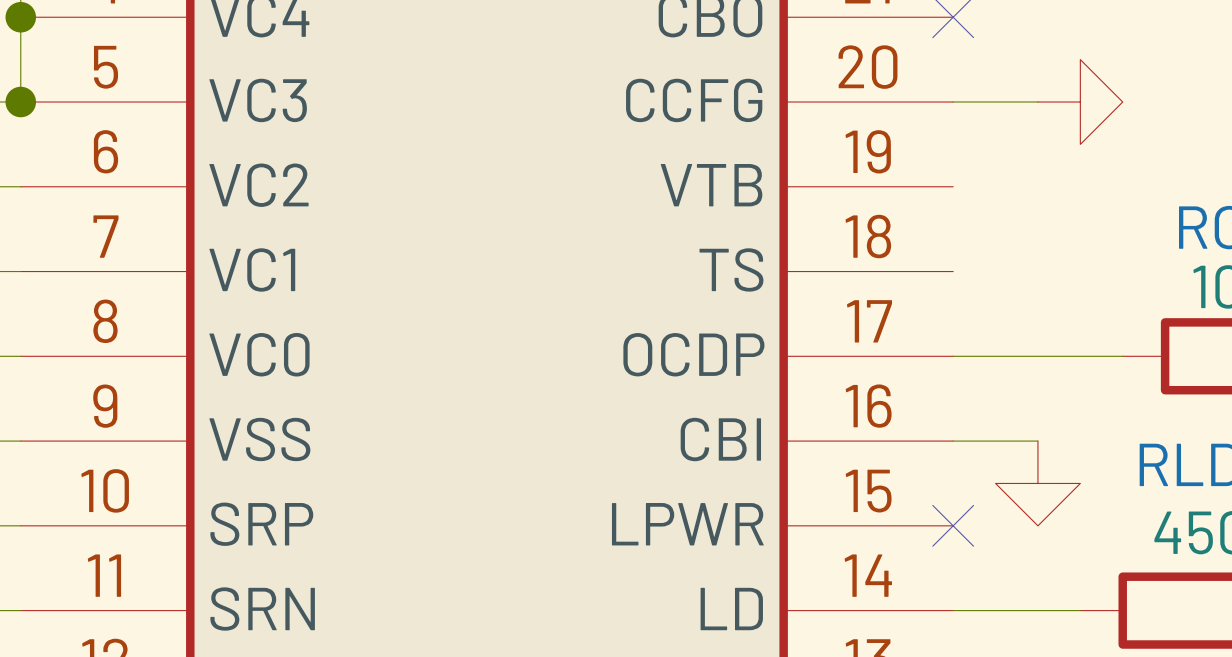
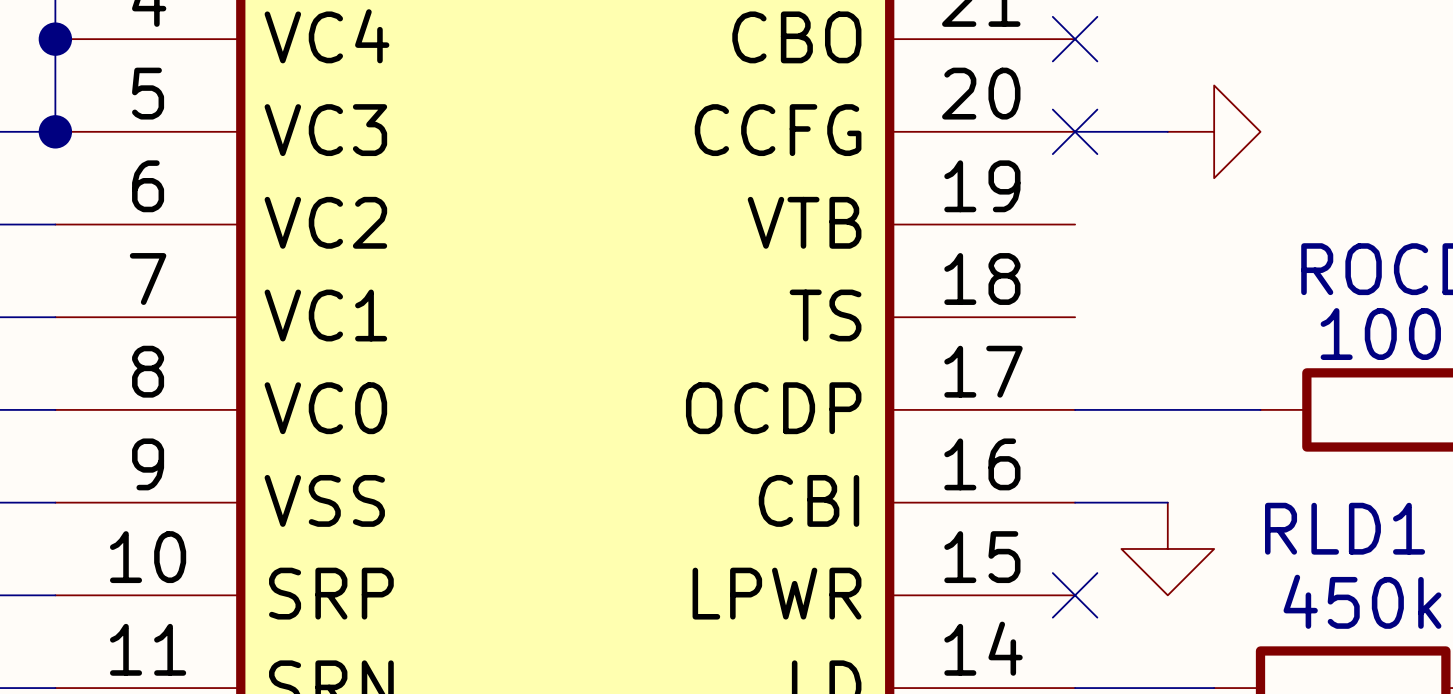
no-connect mark: none -> (1075, 131)

